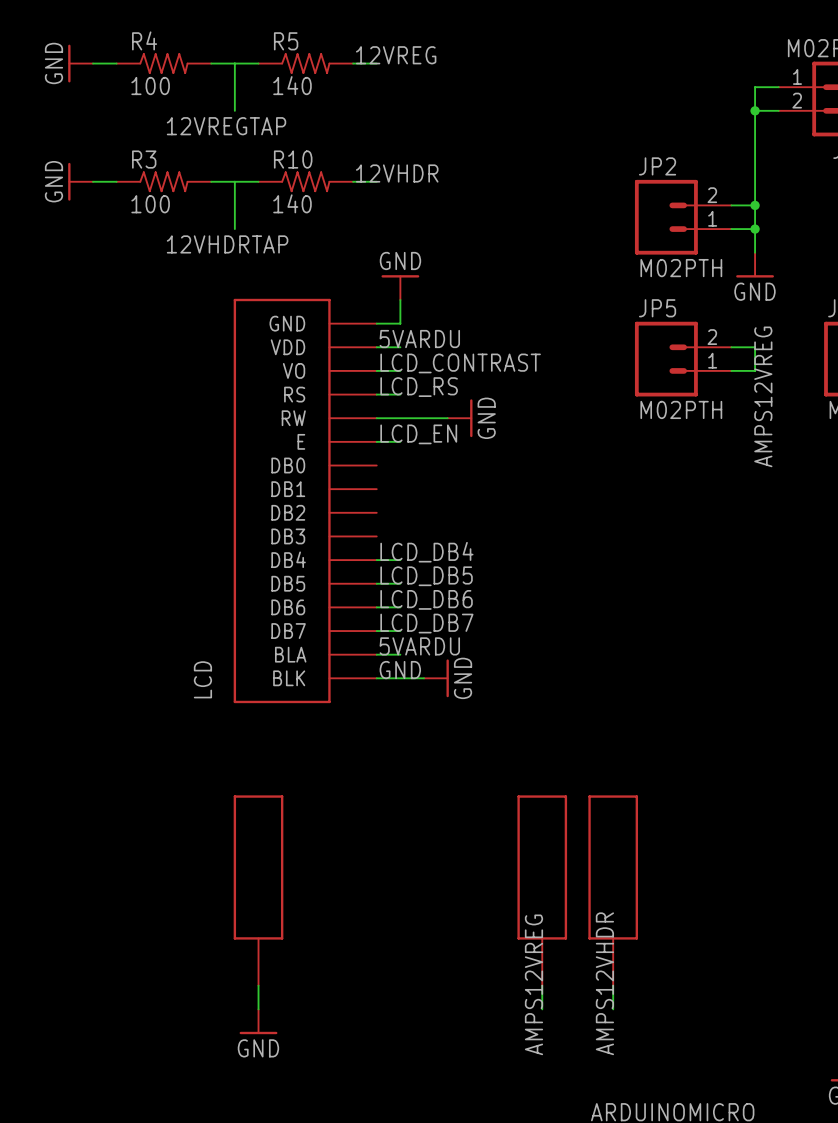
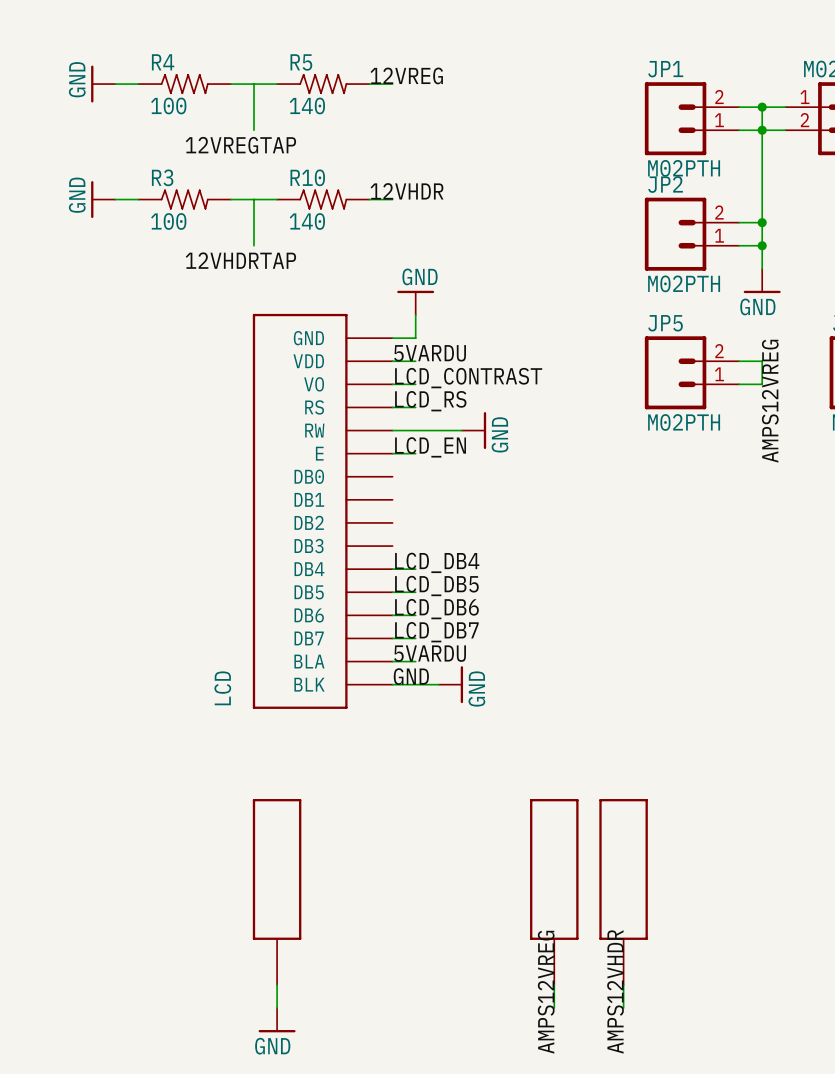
wire: none -> (739, 107) (762, 107)
junction: none -> (762, 107)
JP1: none -> M02PTH (691, 118)
wire: none -> (739, 130) (762, 130)

